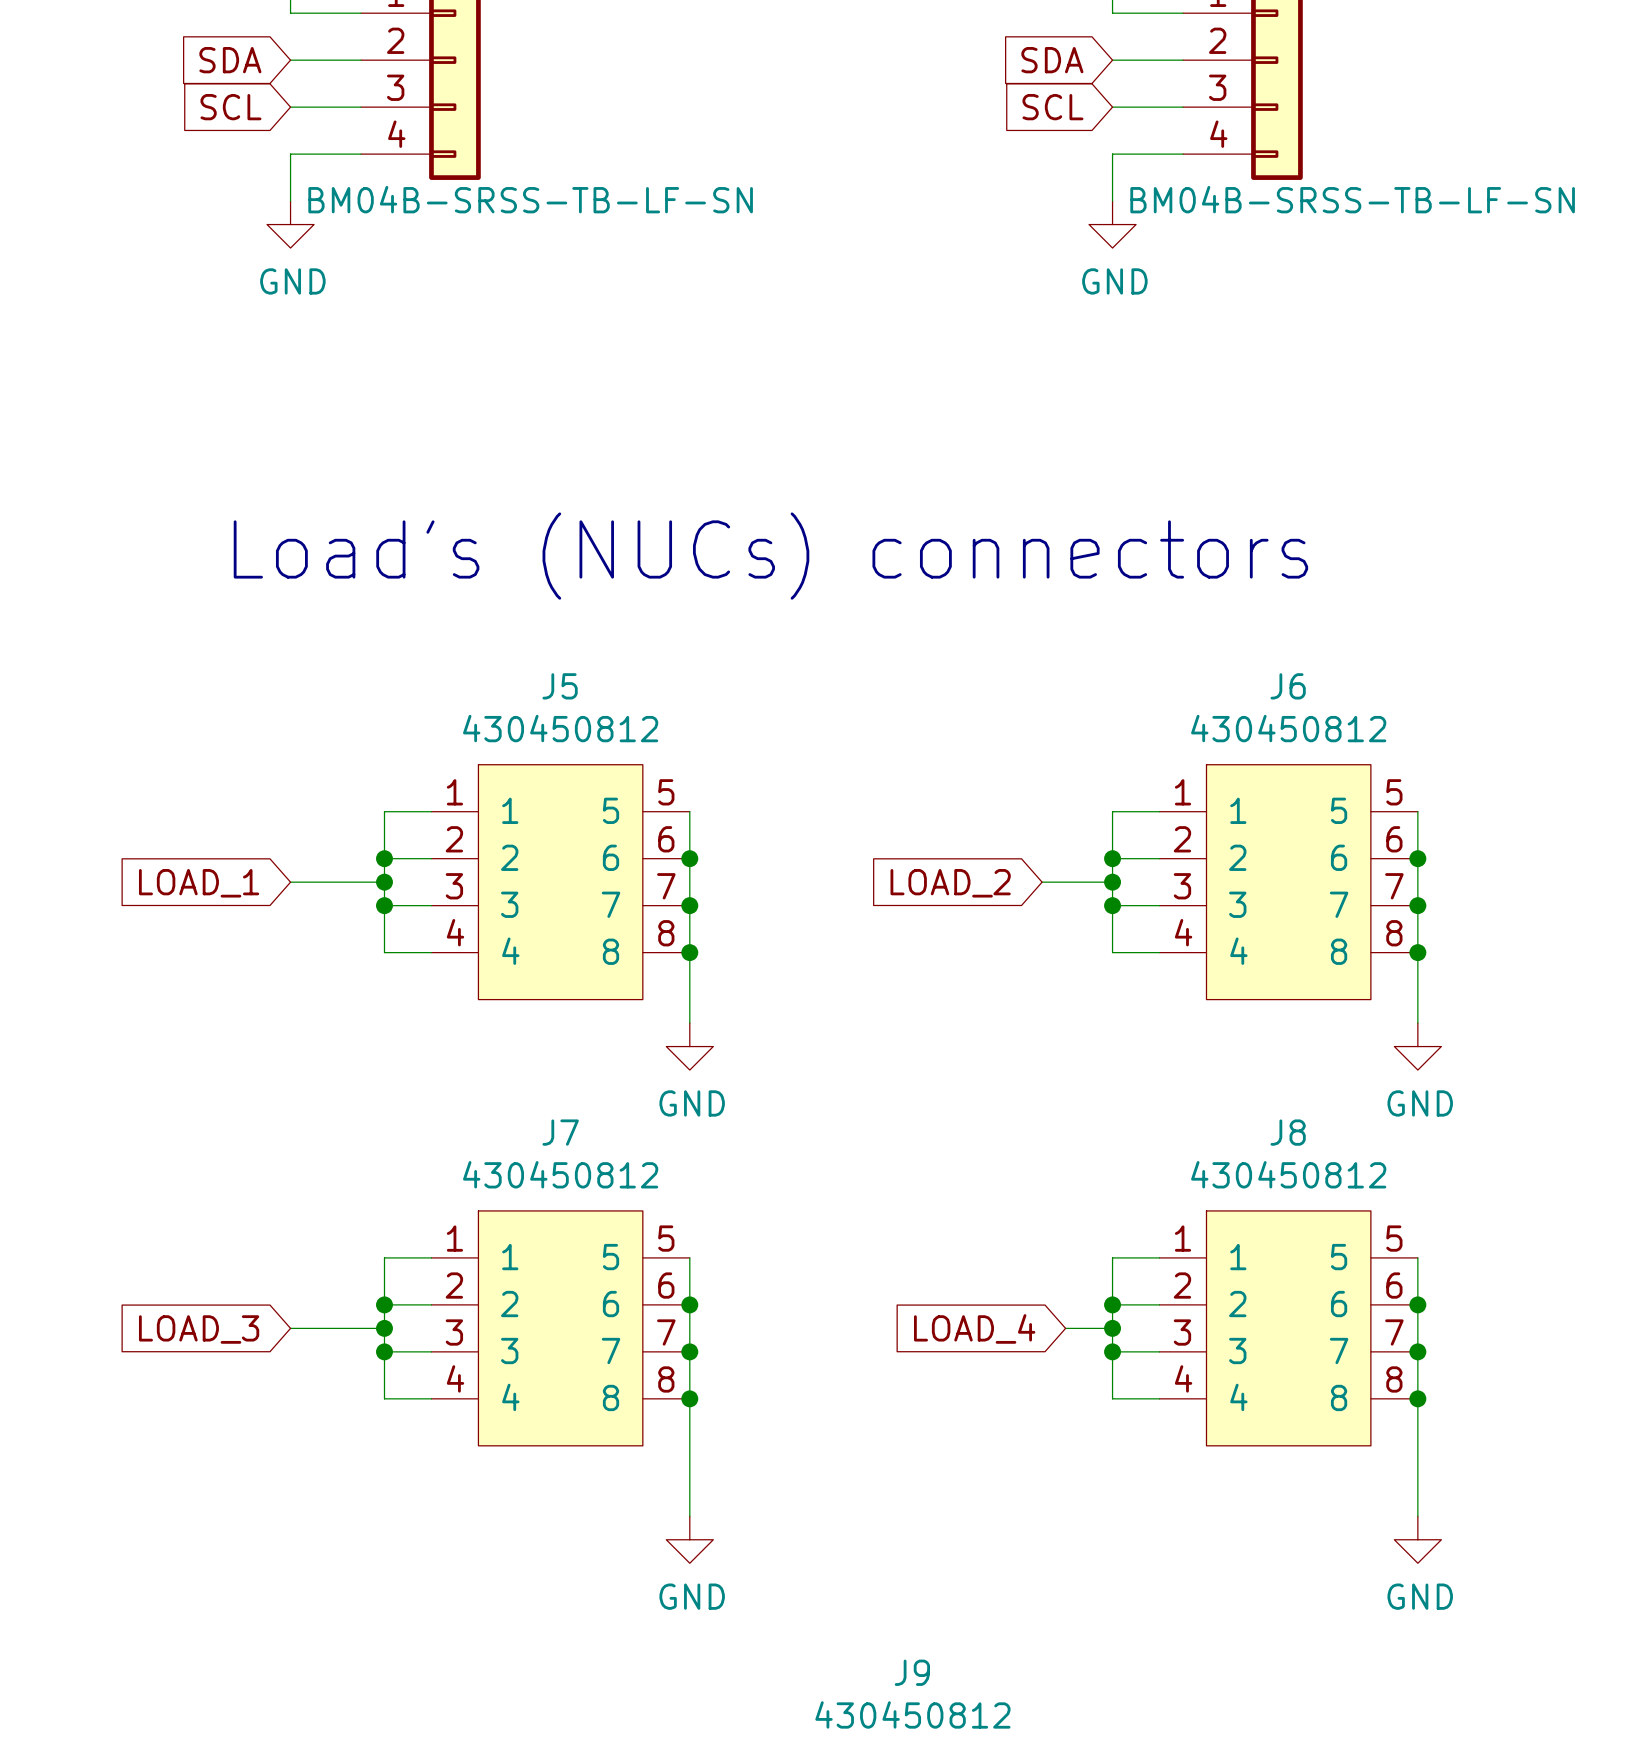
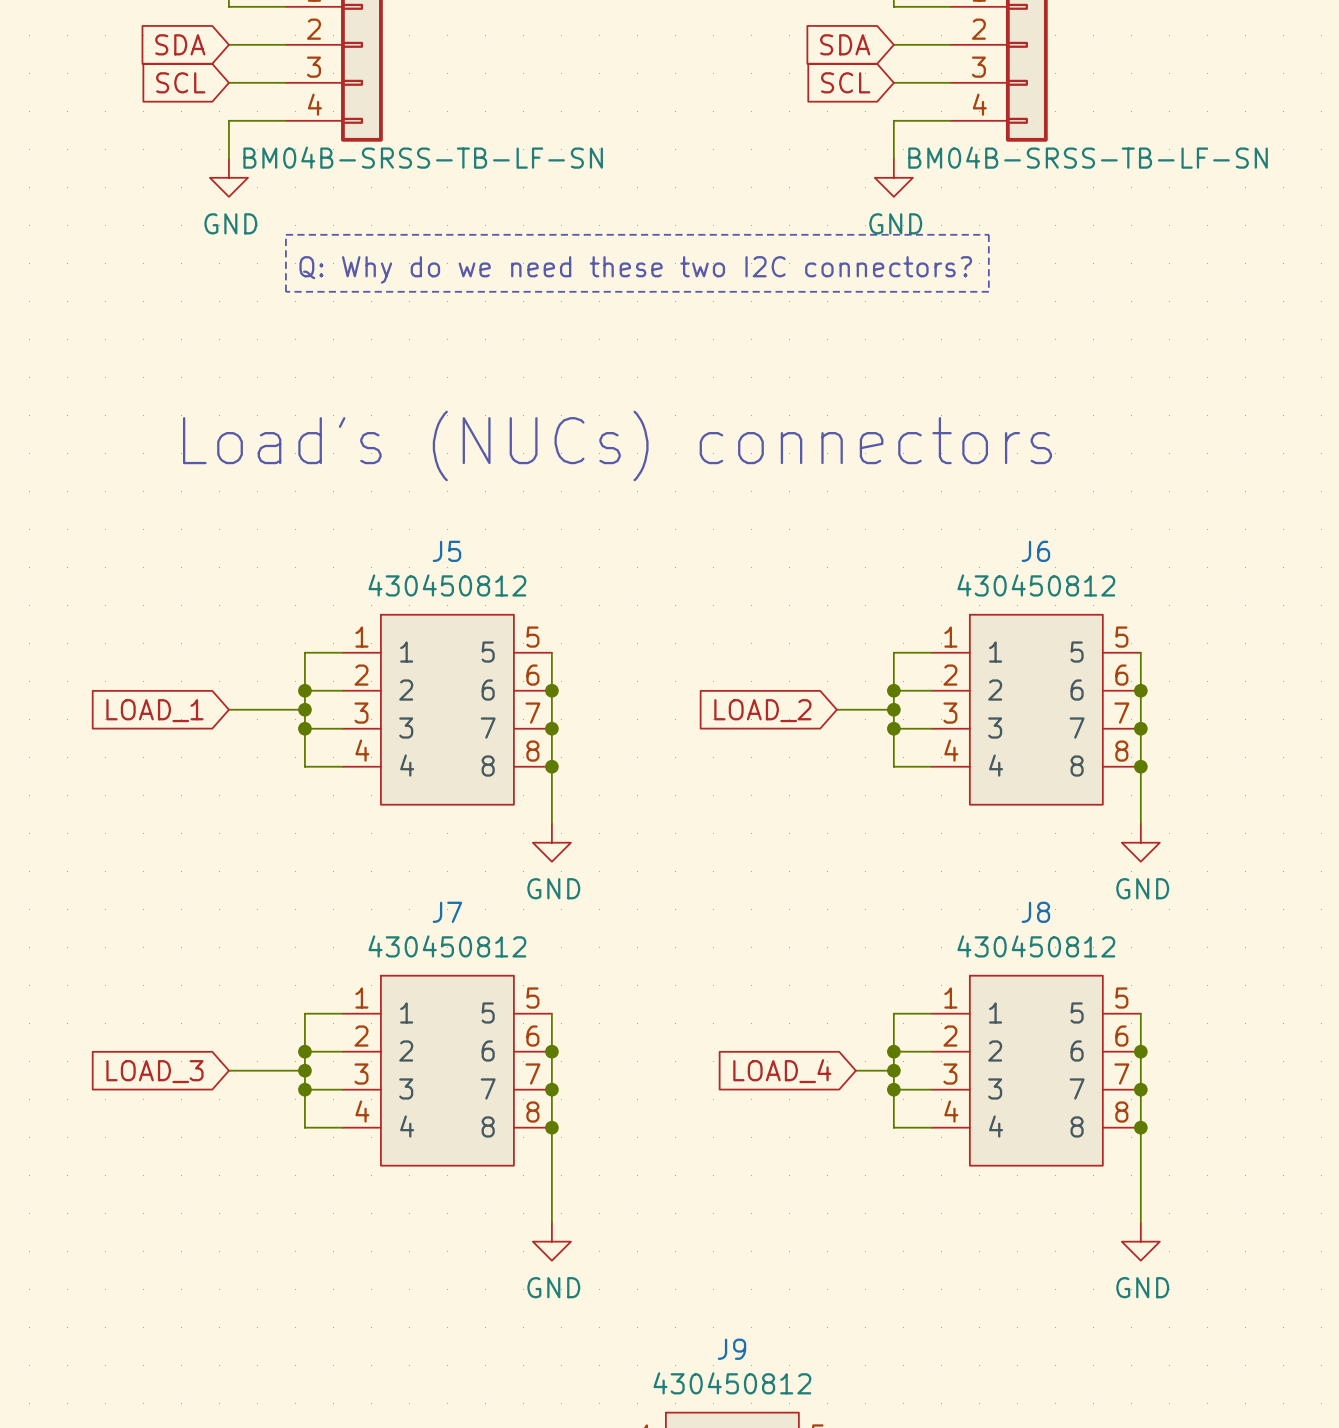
line: none -> (285, 234) (285, 291) (988, 291) (988, 234) (285, 234)
text: none -> Q: Why do we need these two I2C connectors? (635, 269)

